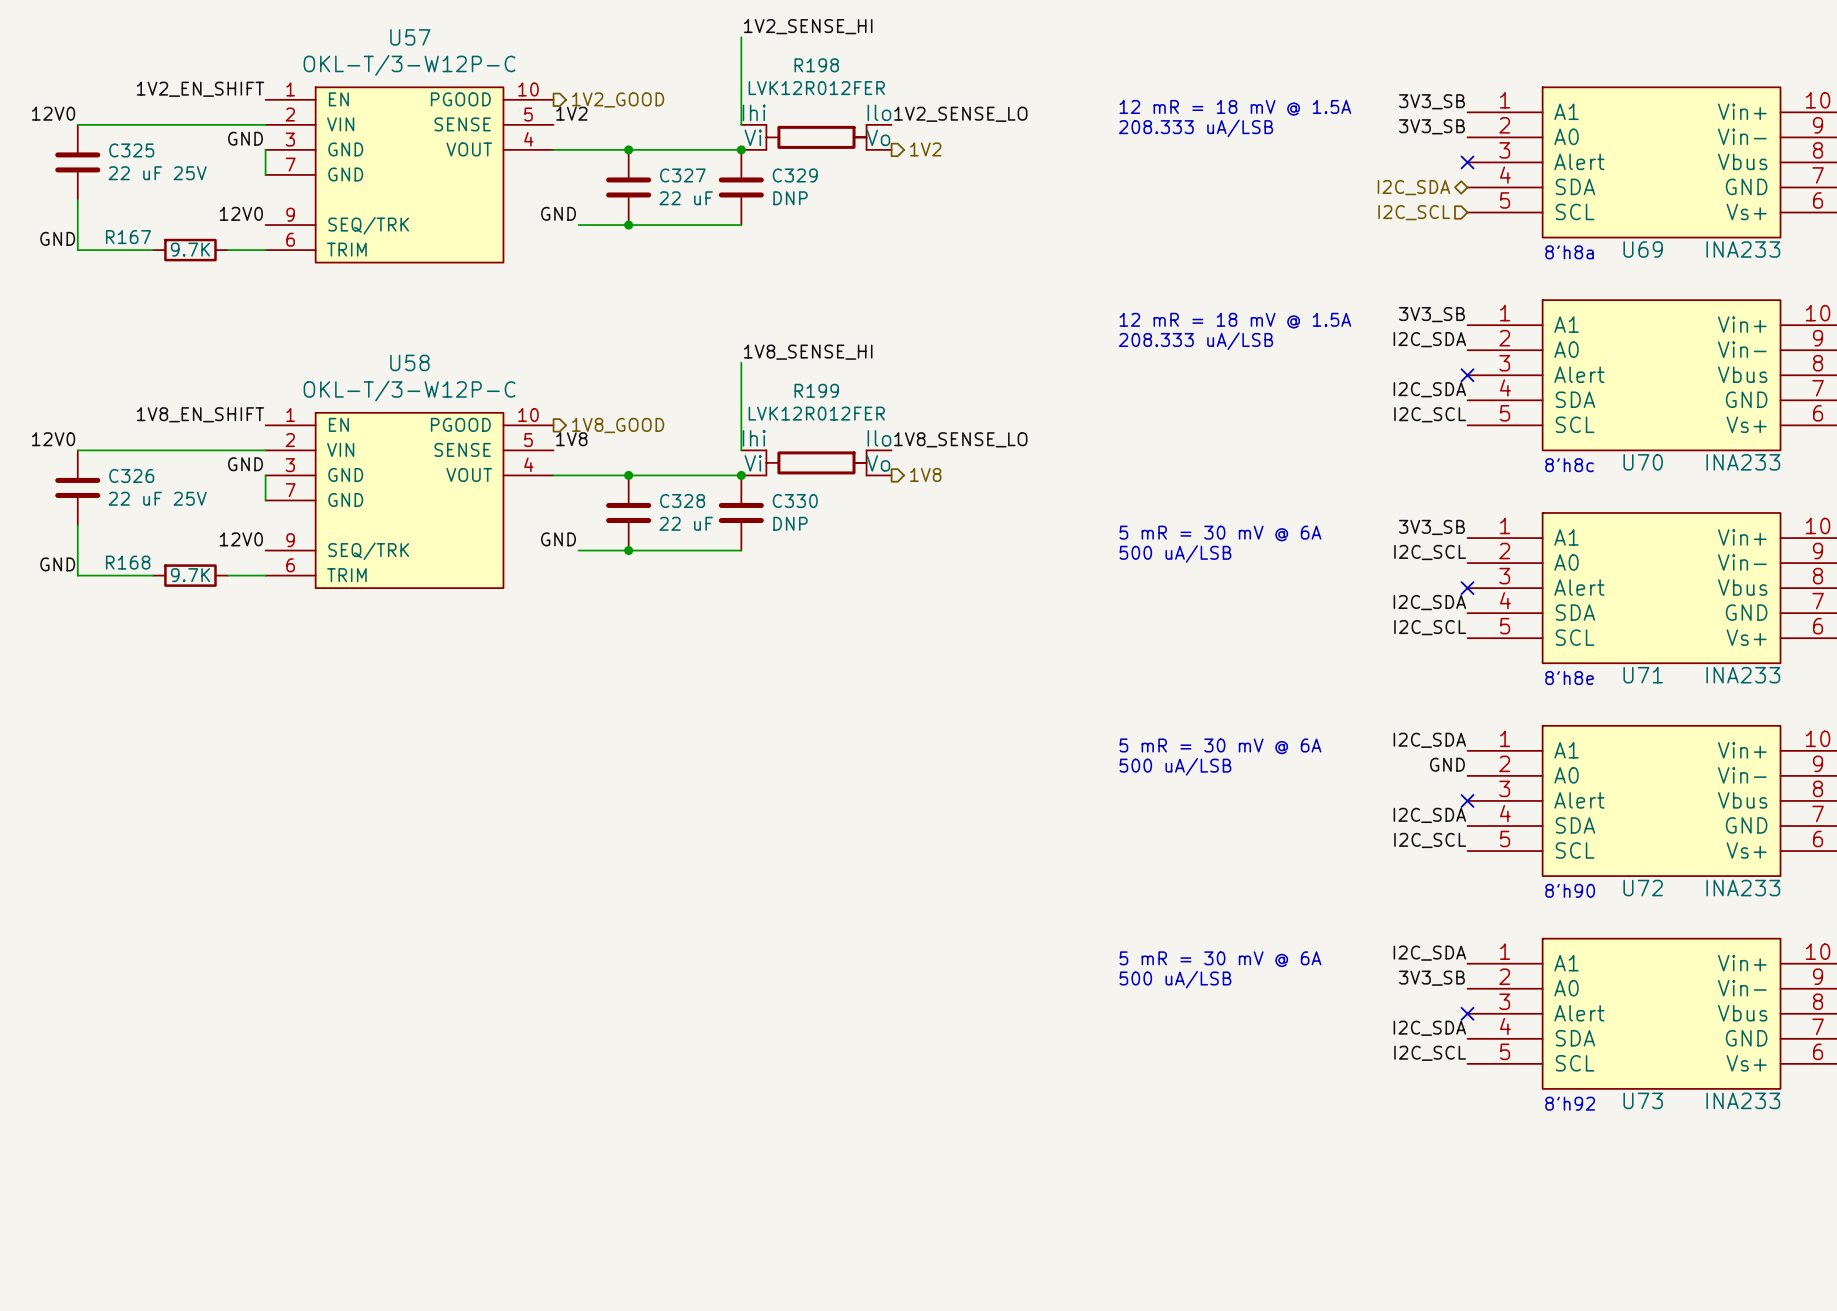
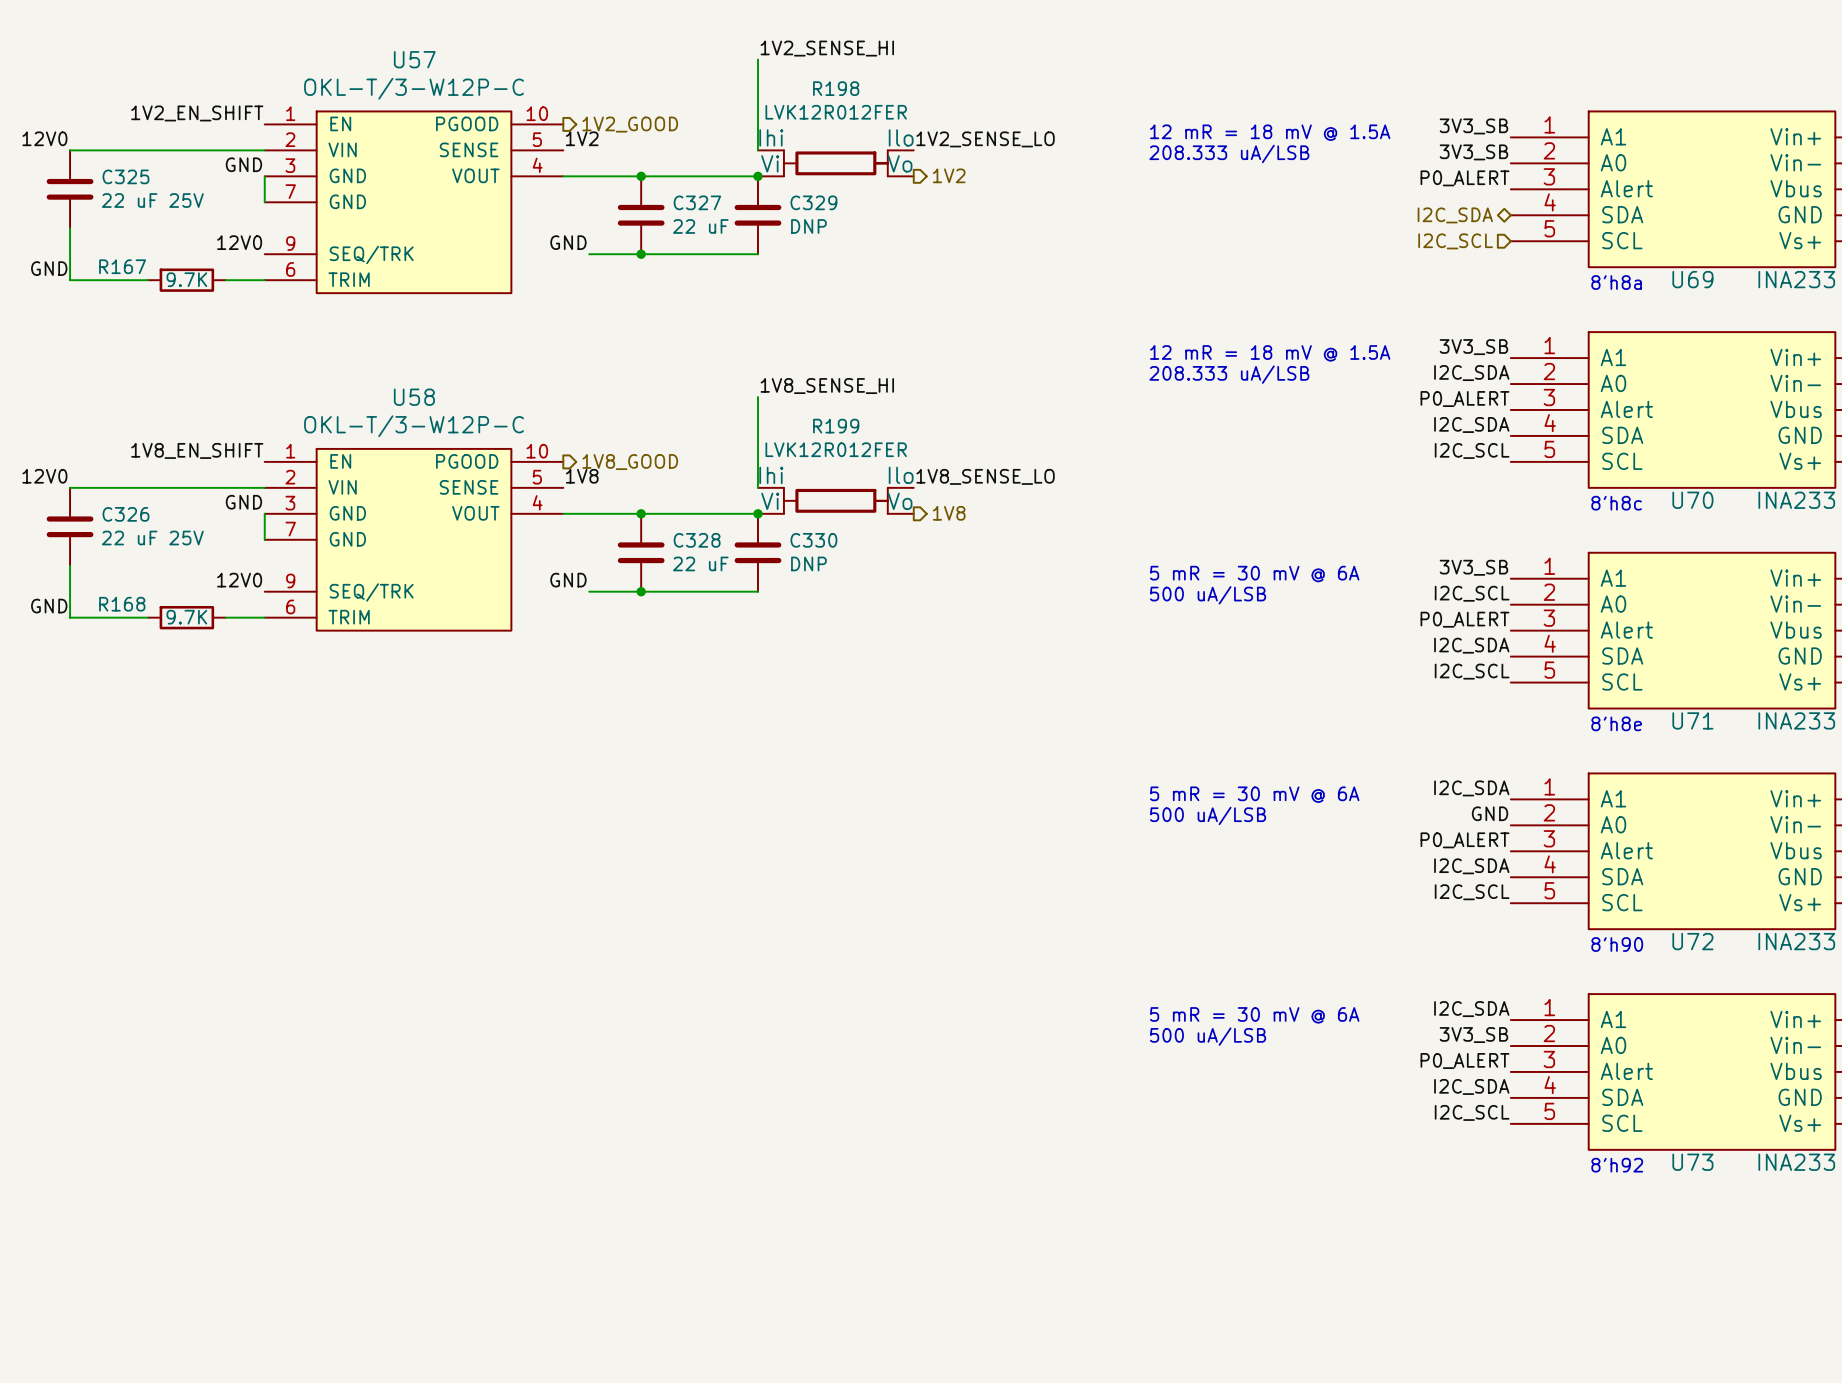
label: none -> P0_ALERT (1465, 178)
no-connect mark: (1467, 162) -> none
label: none -> P0_ALERT (1465, 399)
no-connect mark: (1467, 375) -> none
label: none -> P0_ALERT (1465, 619)
no-connect mark: (1467, 588) -> none
label: none -> P0_ALERT (1465, 840)
no-connect mark: (1467, 800) -> none
label: none -> P0_ALERT (1465, 1061)
no-connect mark: (1467, 1013) -> none

